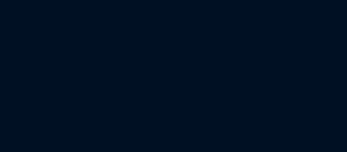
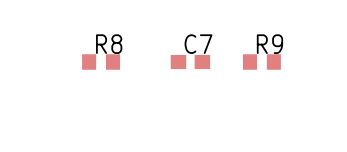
R8: none -> (101, 62)
C7: none -> (190, 62)
R9: none -> (261, 62)

